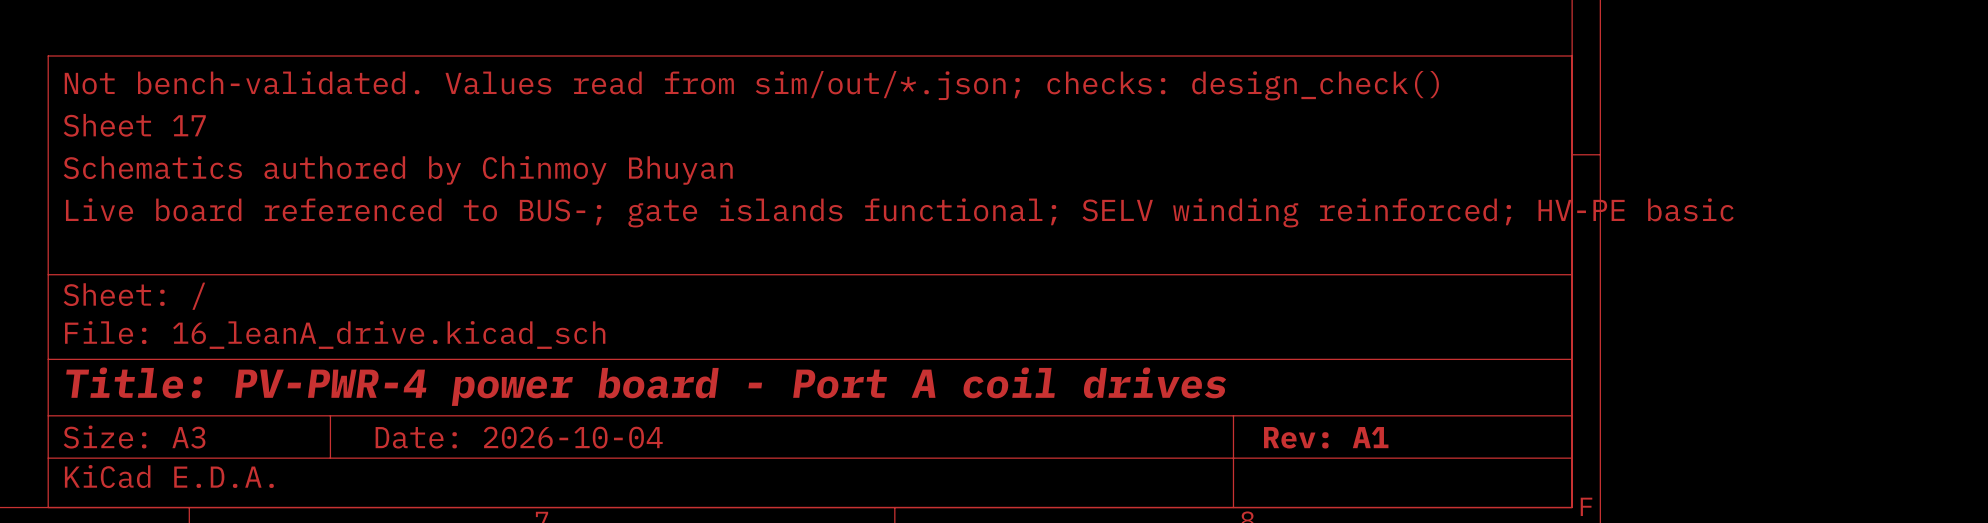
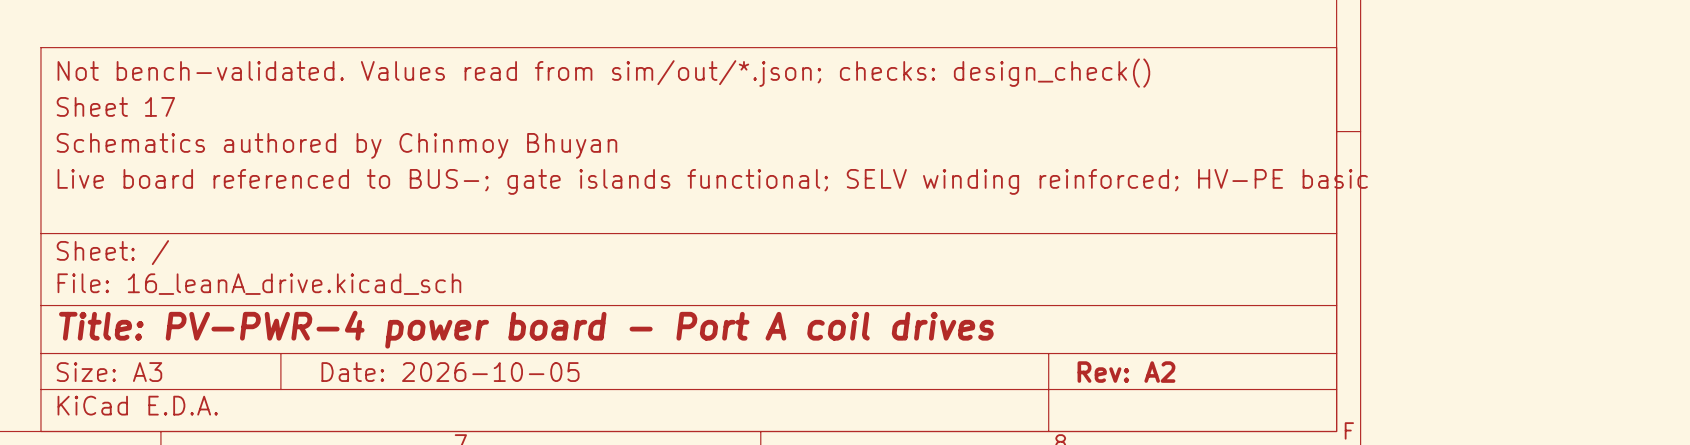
title block: Date: 2026-10-04 (519, 437) -> Date: 2026-10-05 (450, 372)
title block: Rev: A1 (1326, 437) -> Rev: A2 (1126, 372)

